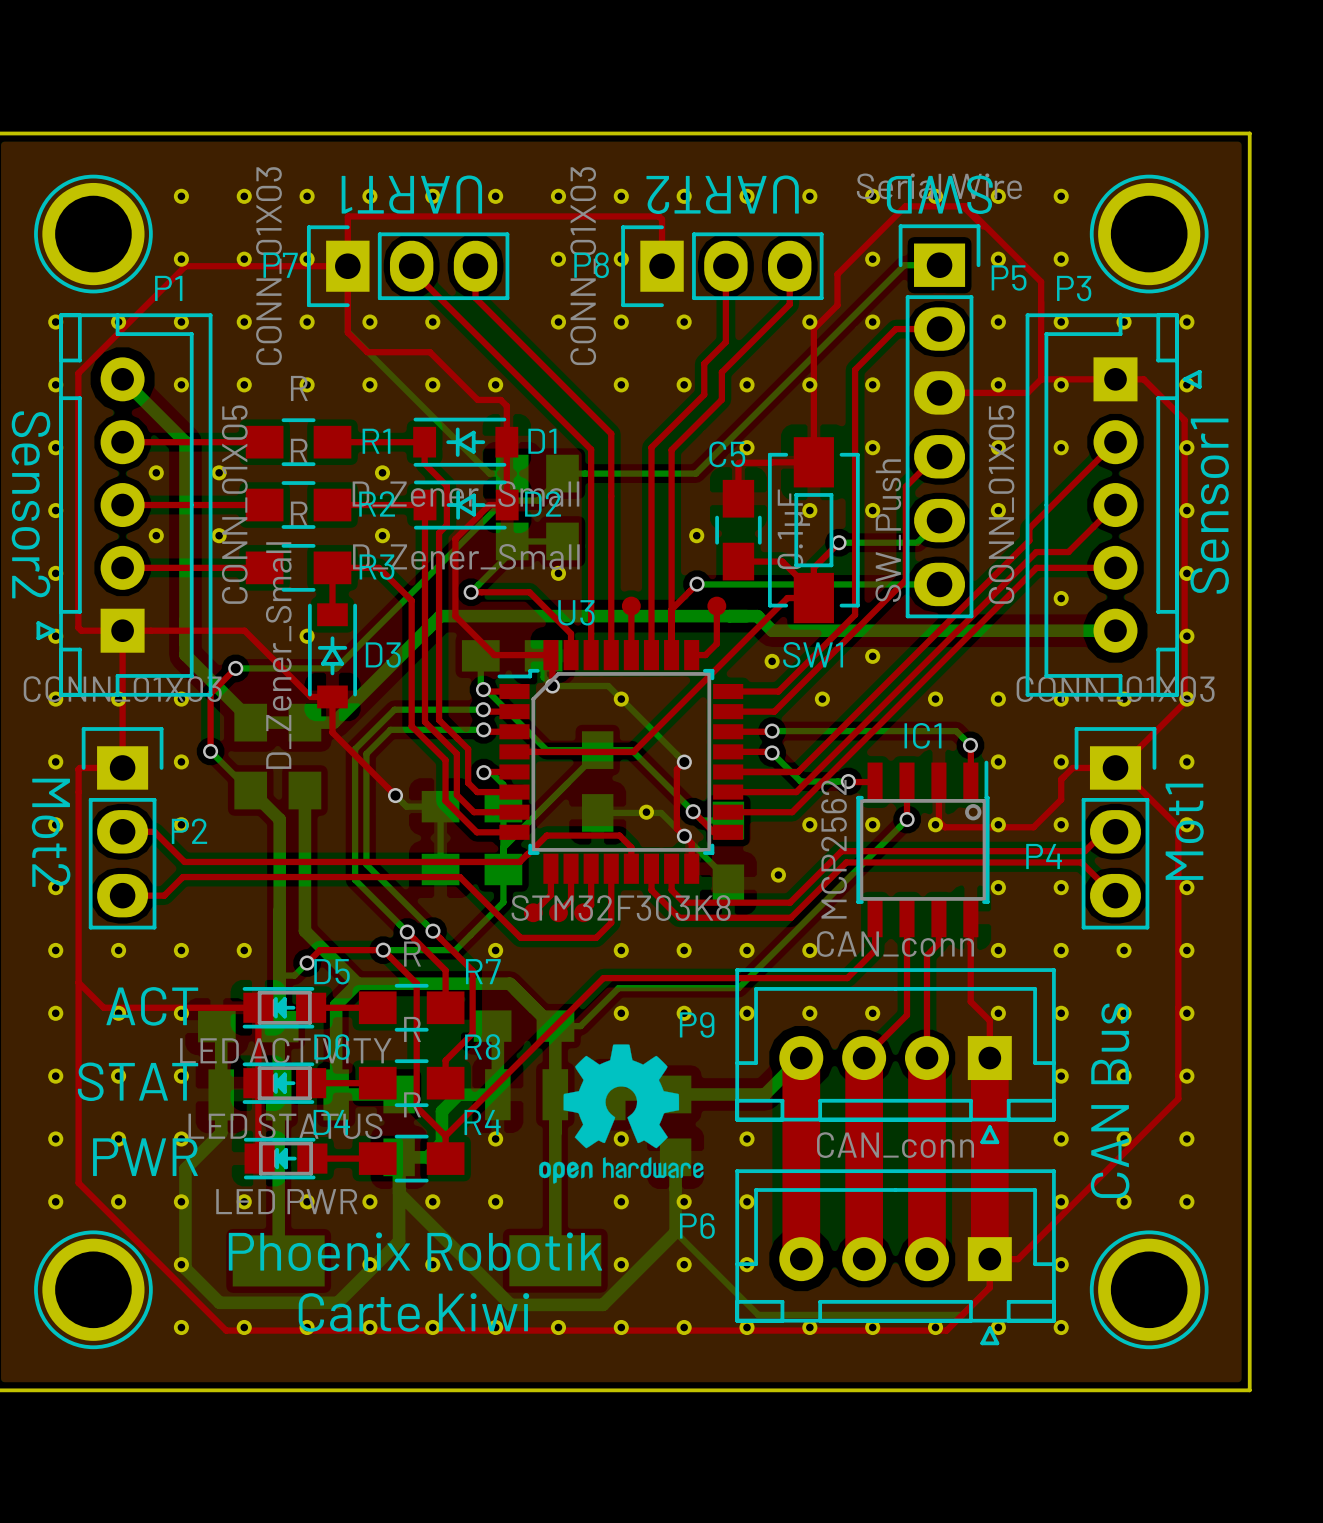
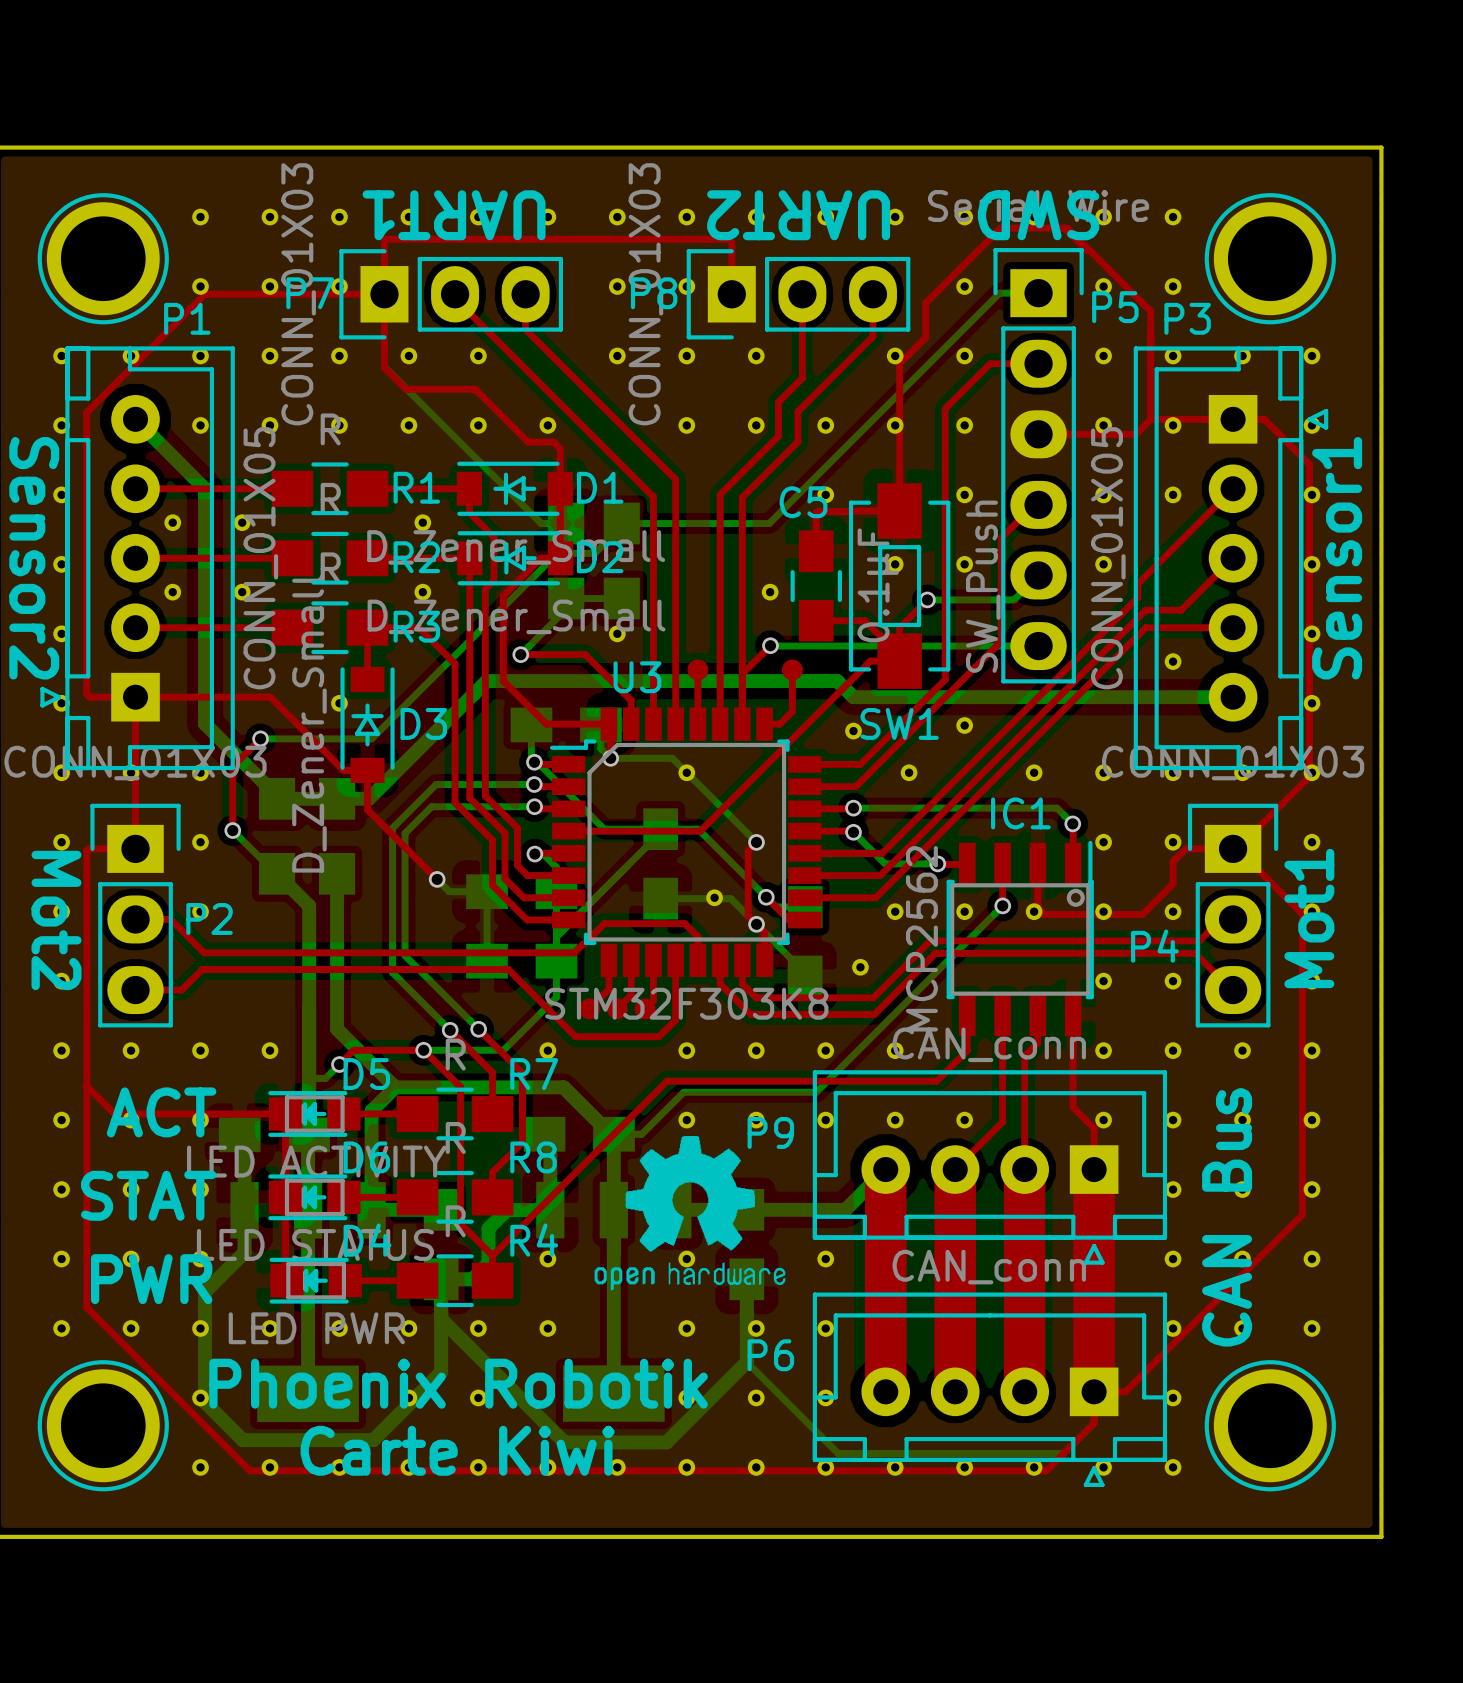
drawing shape: [539, 1044, 704, 1184] -> [594, 1136, 786, 1291]

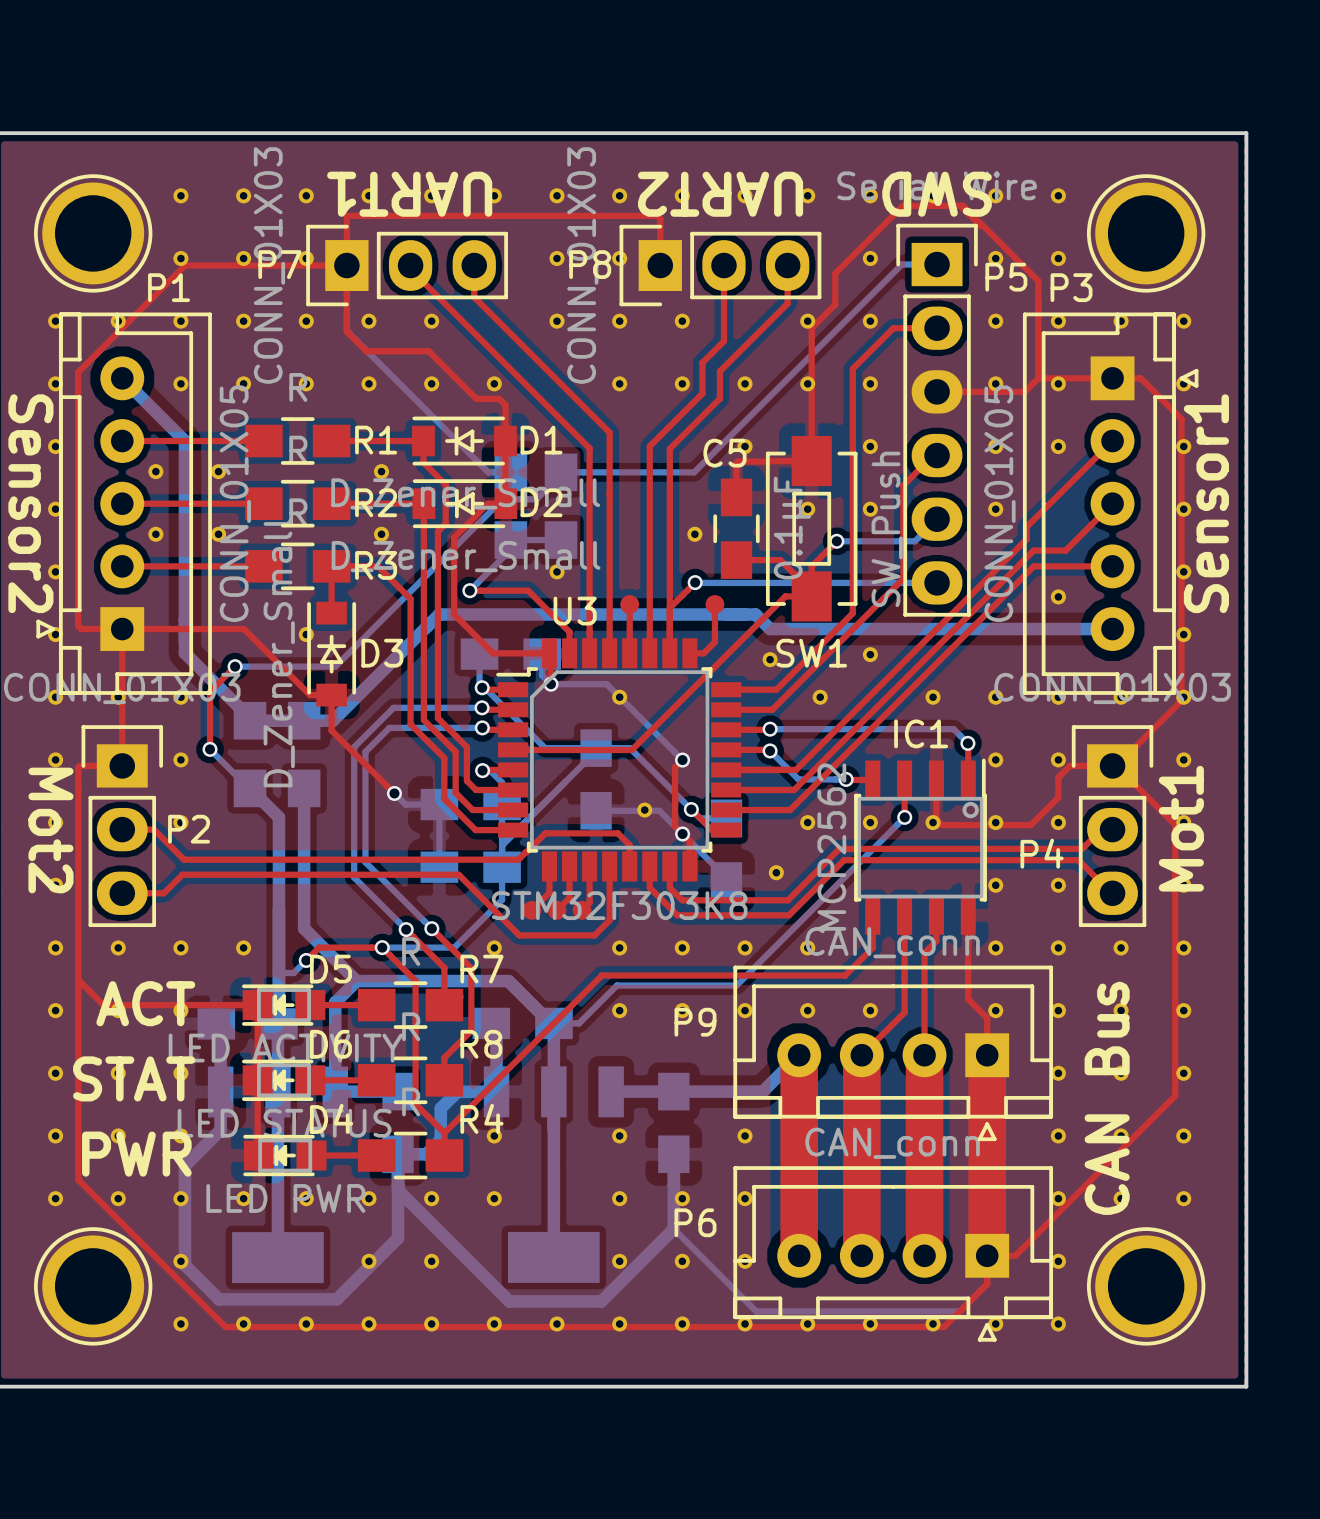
drawing: [594, 1136, 786, 1291] -> none
text: Phoenix Robotik (458, 1383) -> none
text: Carte Kiwi (457, 1450) -> none

